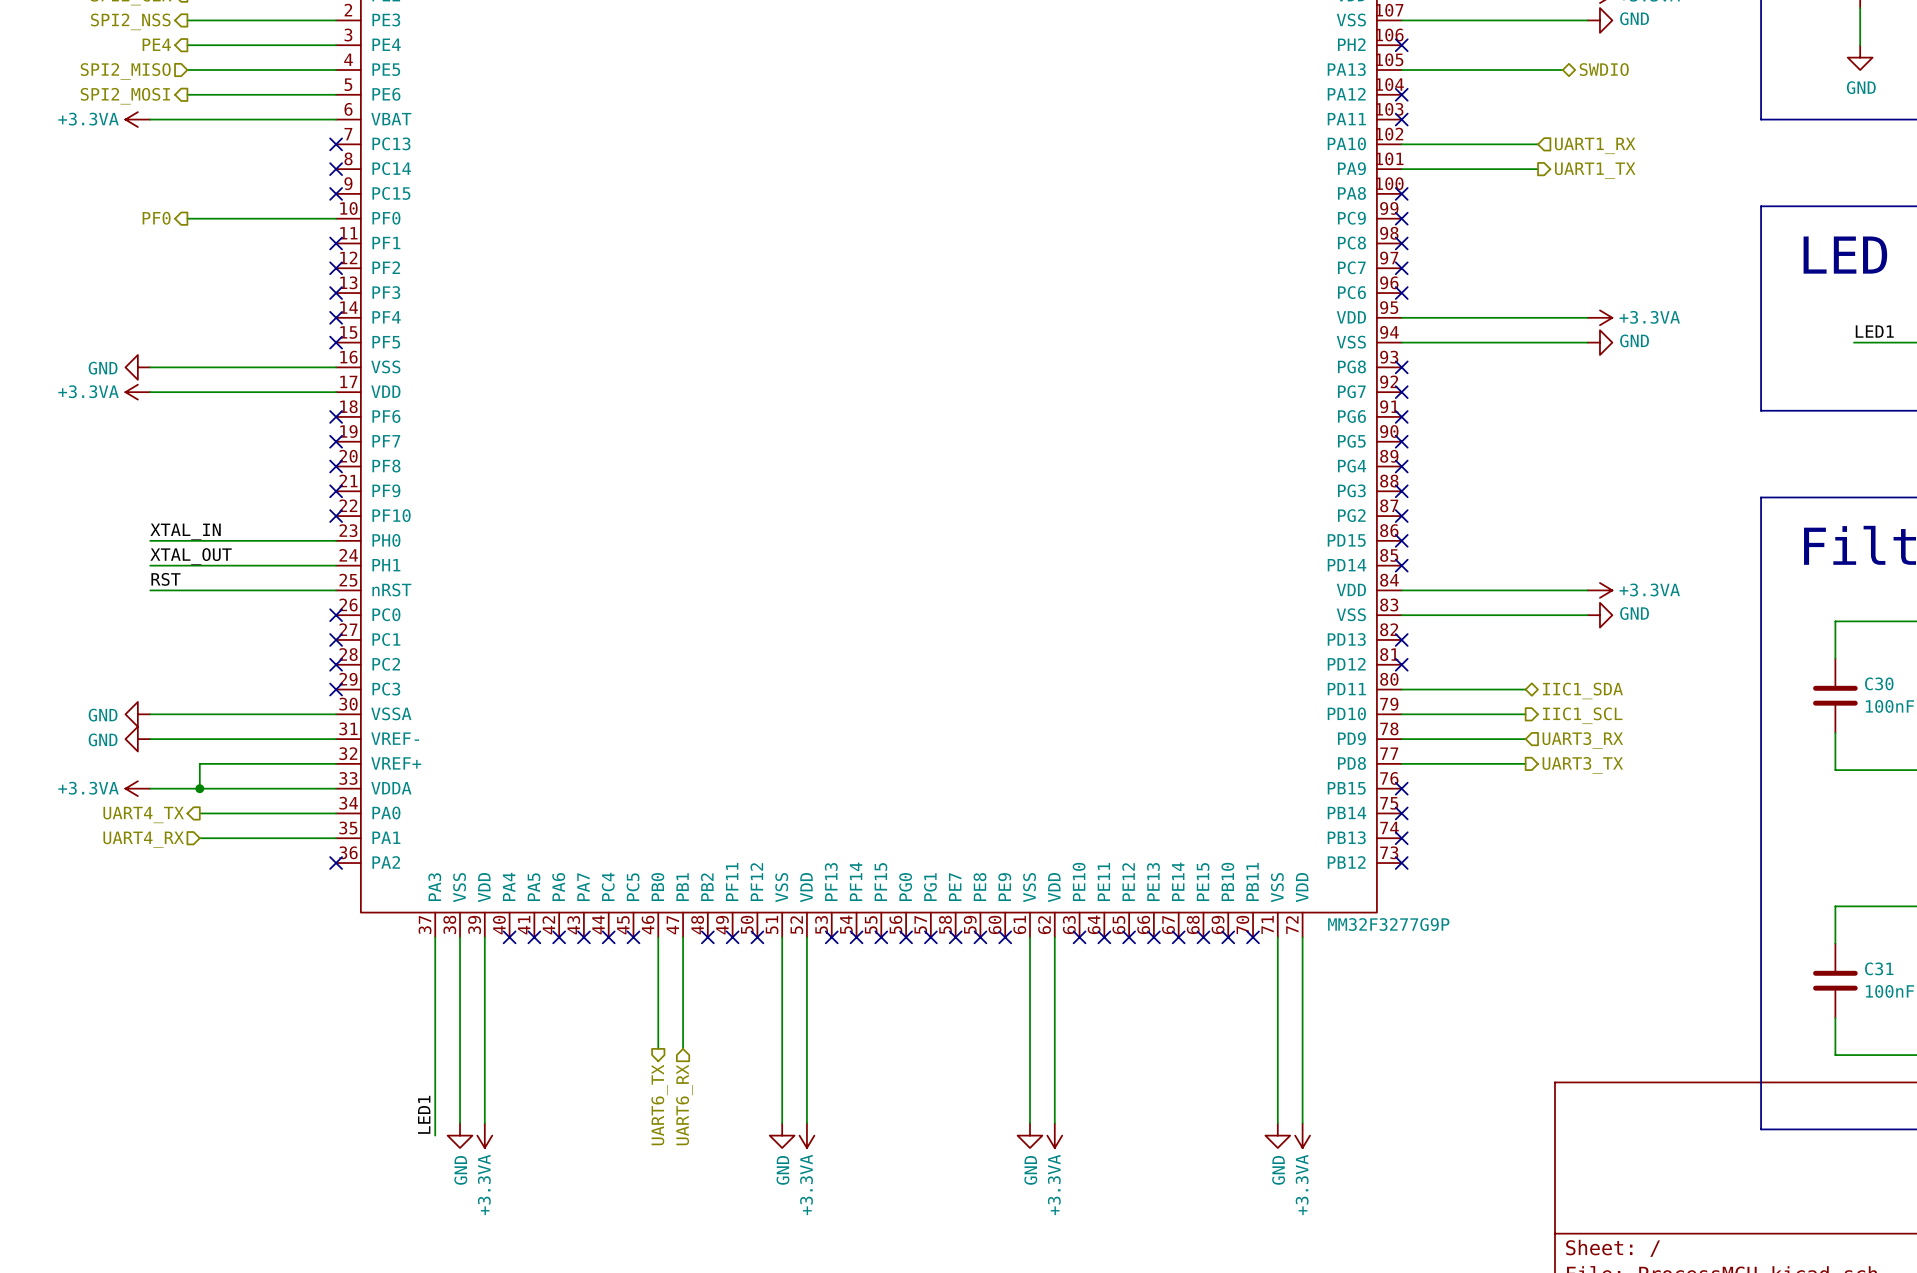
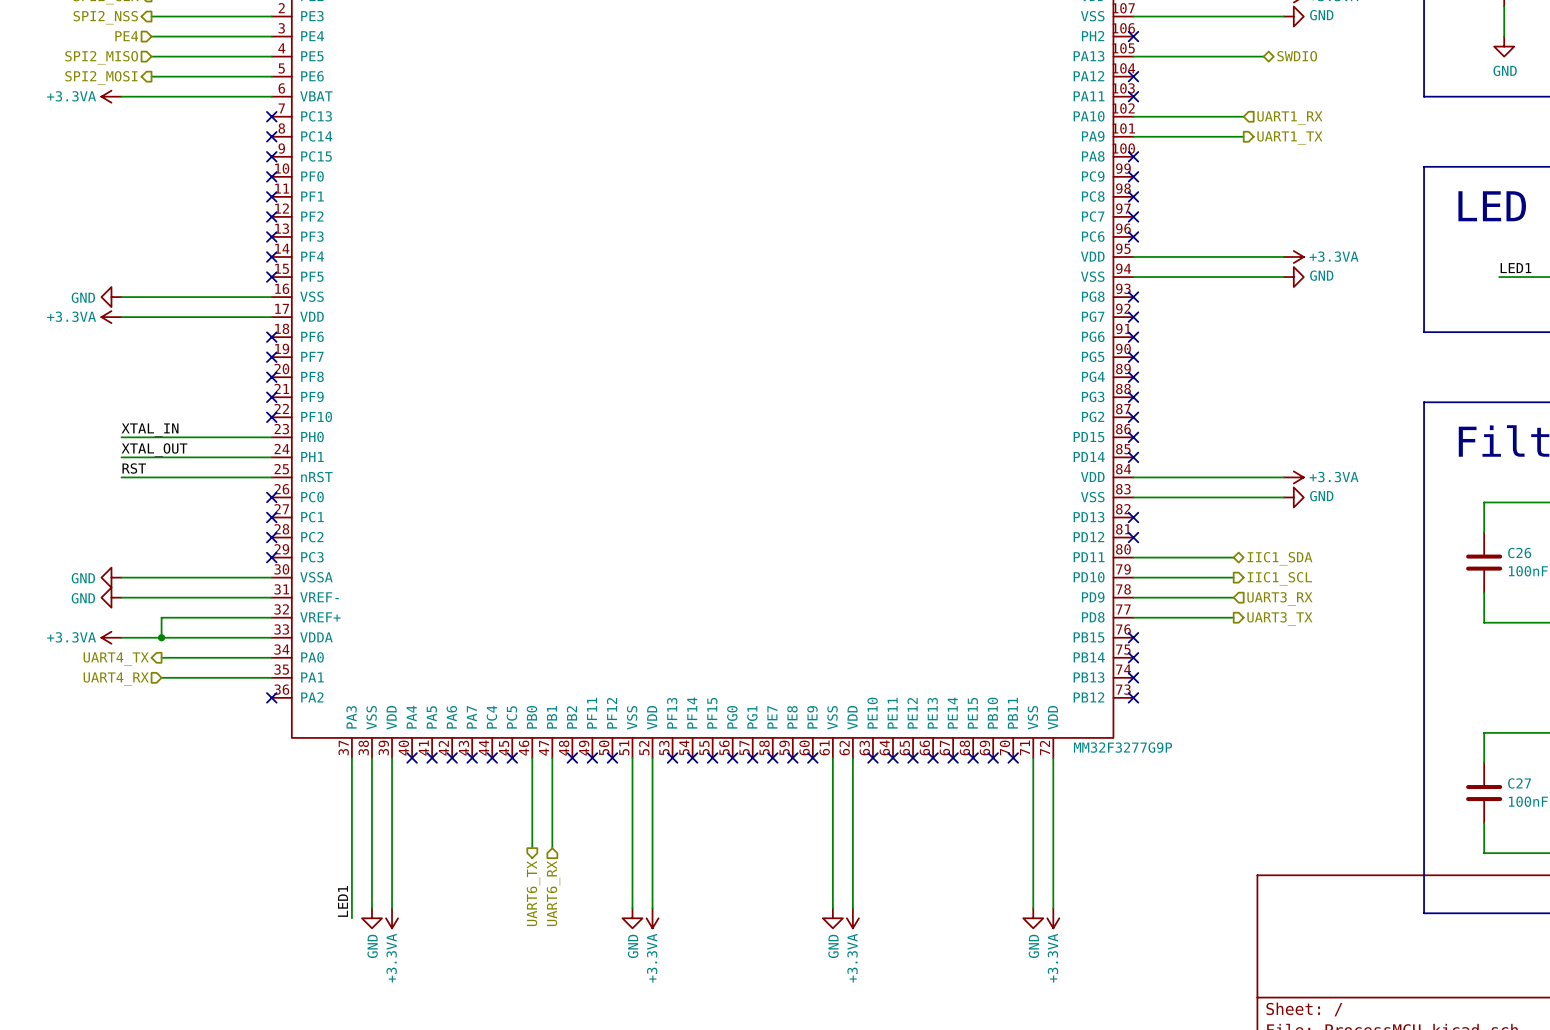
hierarchical label shape: output (156, 44) -> input (126, 36)
hierarchical label: PF0 (156, 218) -> none
wire: (187, 218) (336, 218) -> none
no-connect mark: none -> (271, 176)
C30 name: C30 (1879, 683) -> C26 (1519, 553)
C31 name: C31 (1879, 968) -> C27 (1519, 783)

